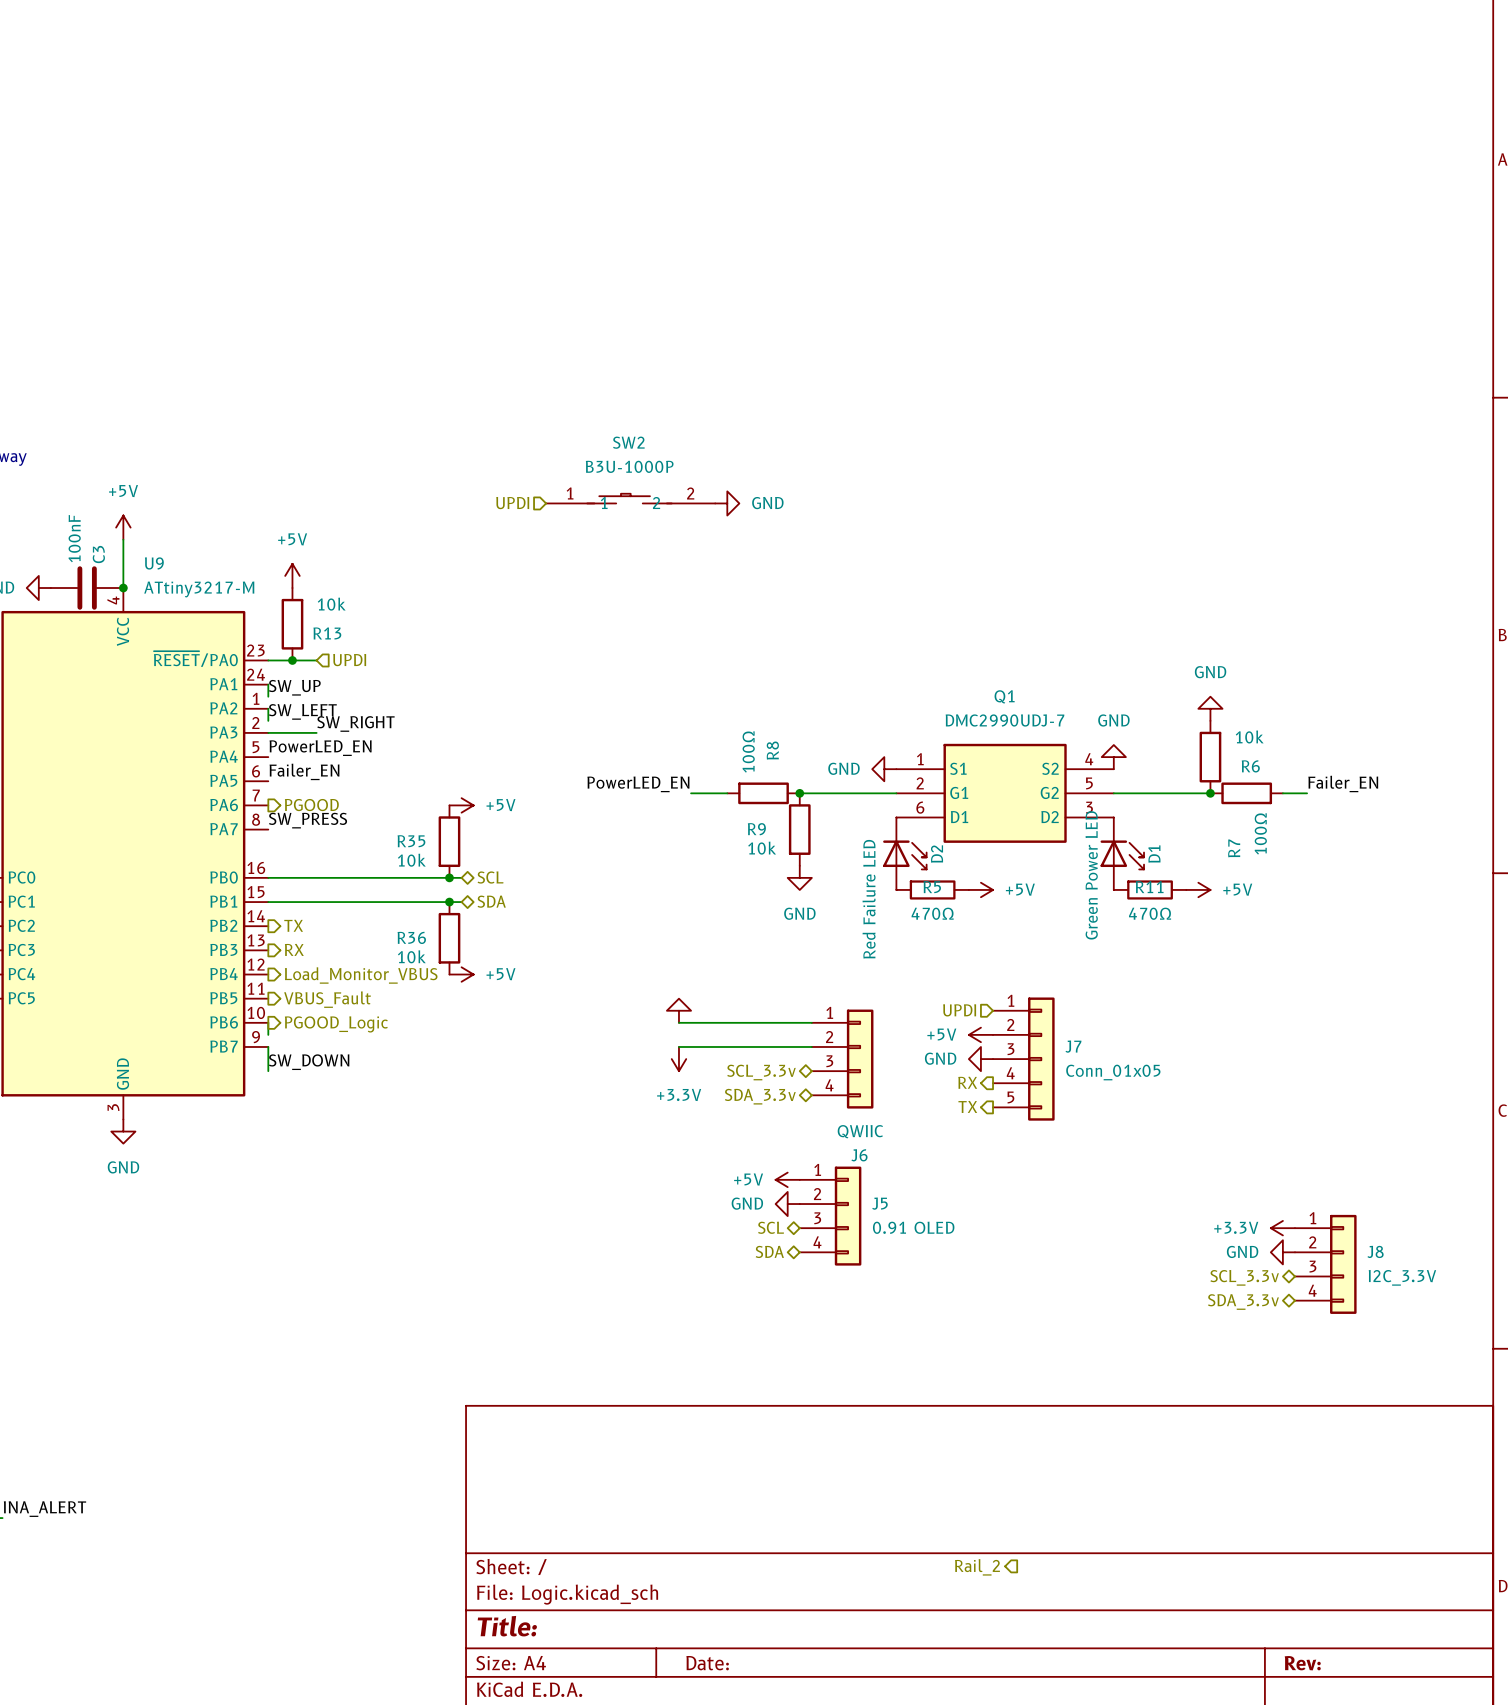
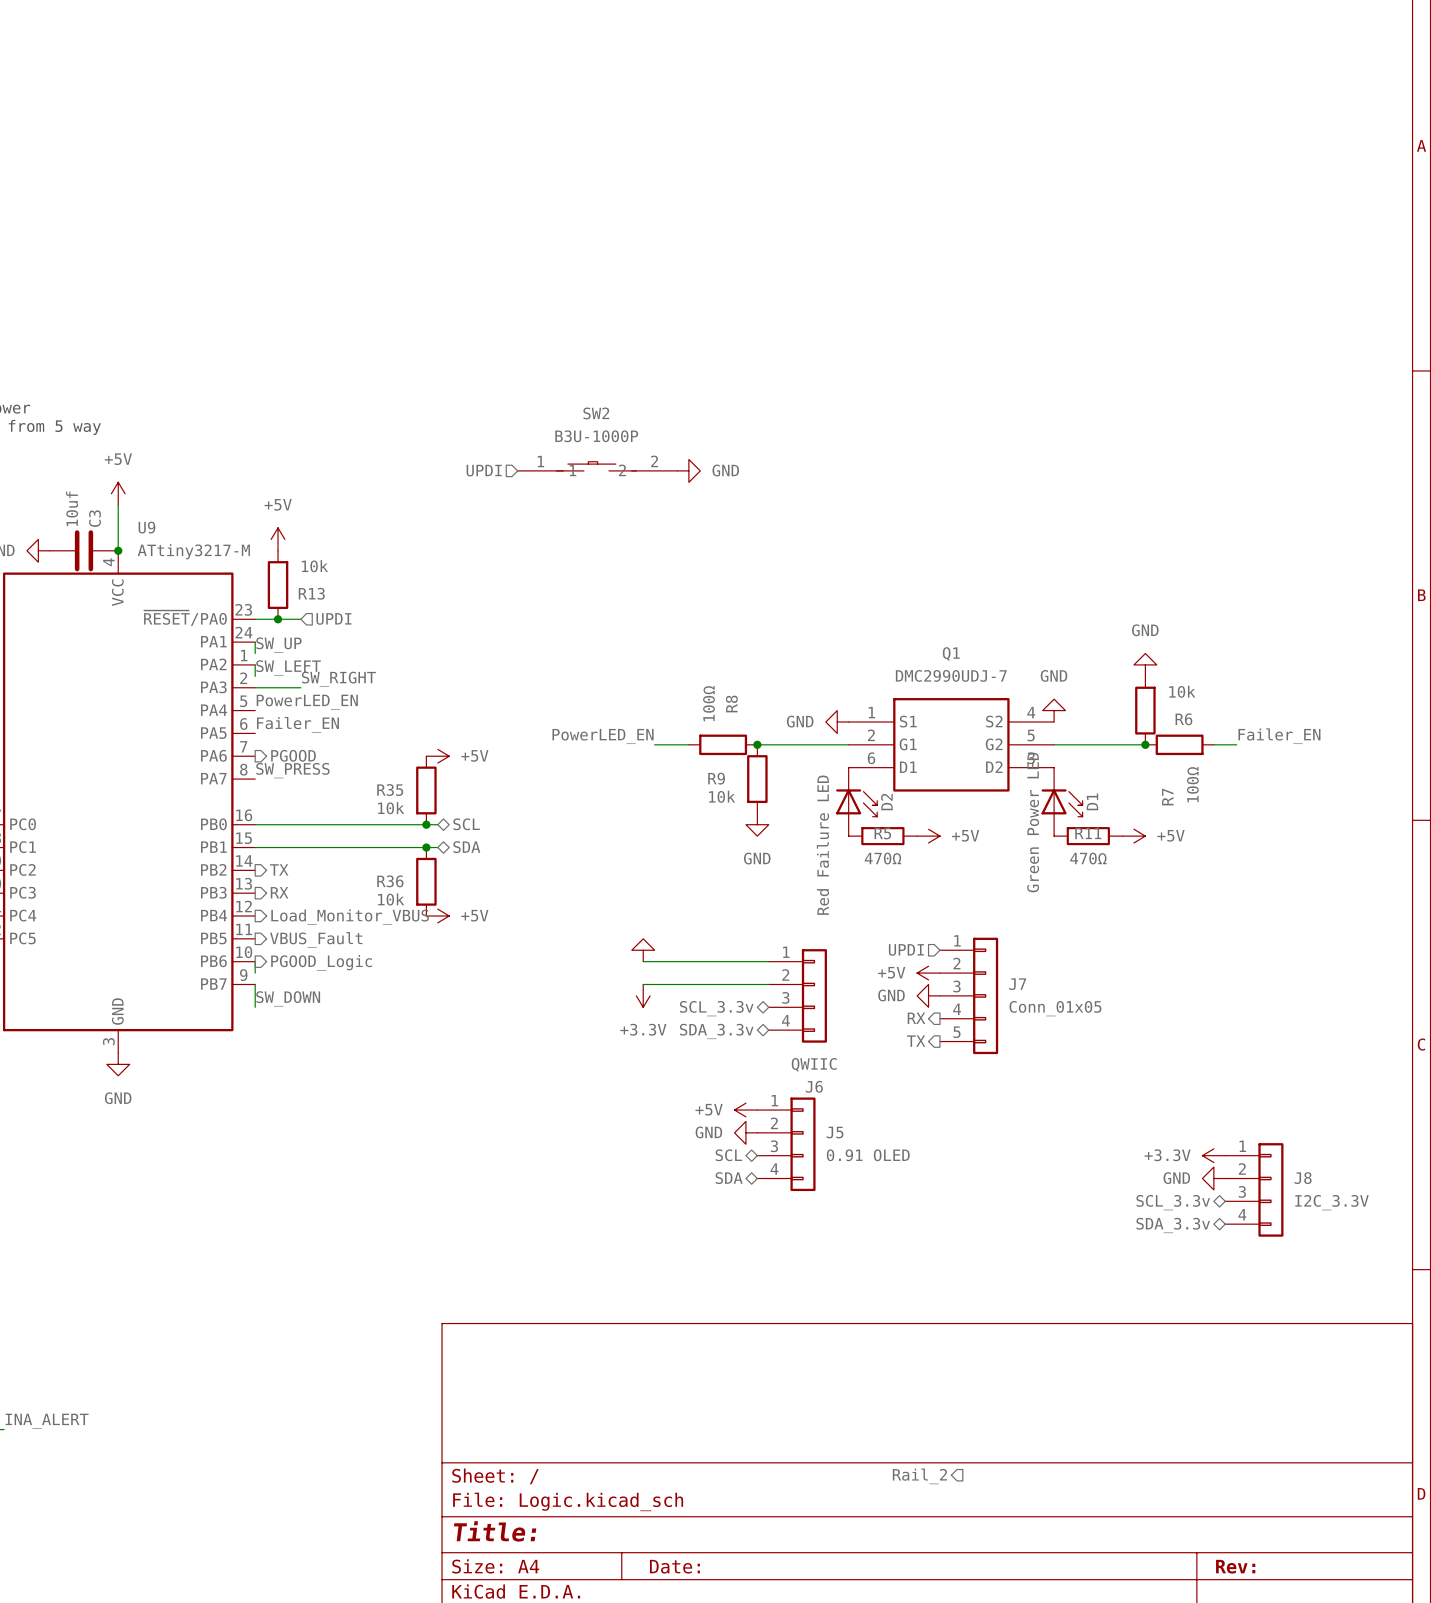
C3 value: 100nF (74, 538) -> 10uf (72, 508)

